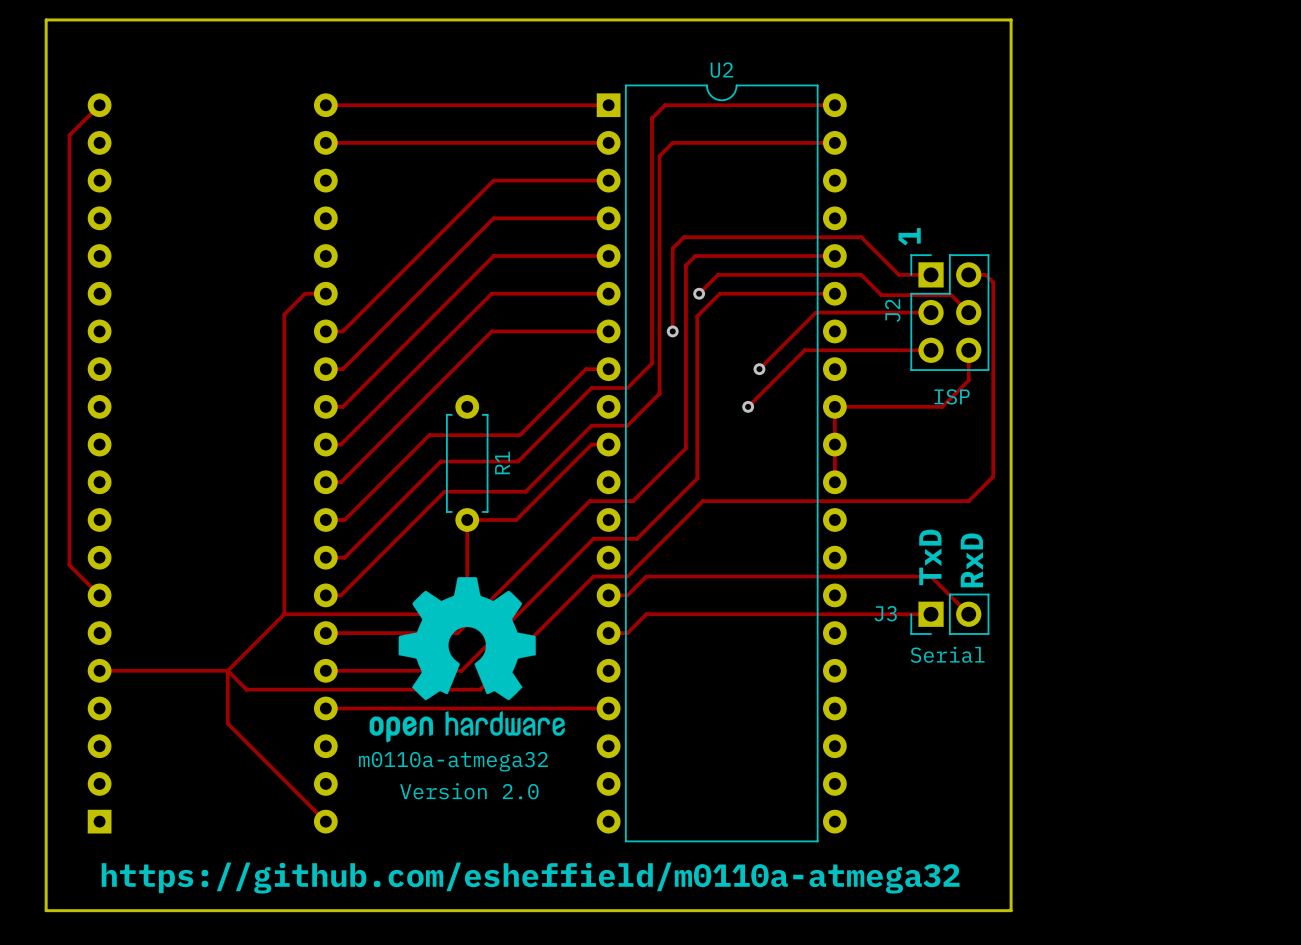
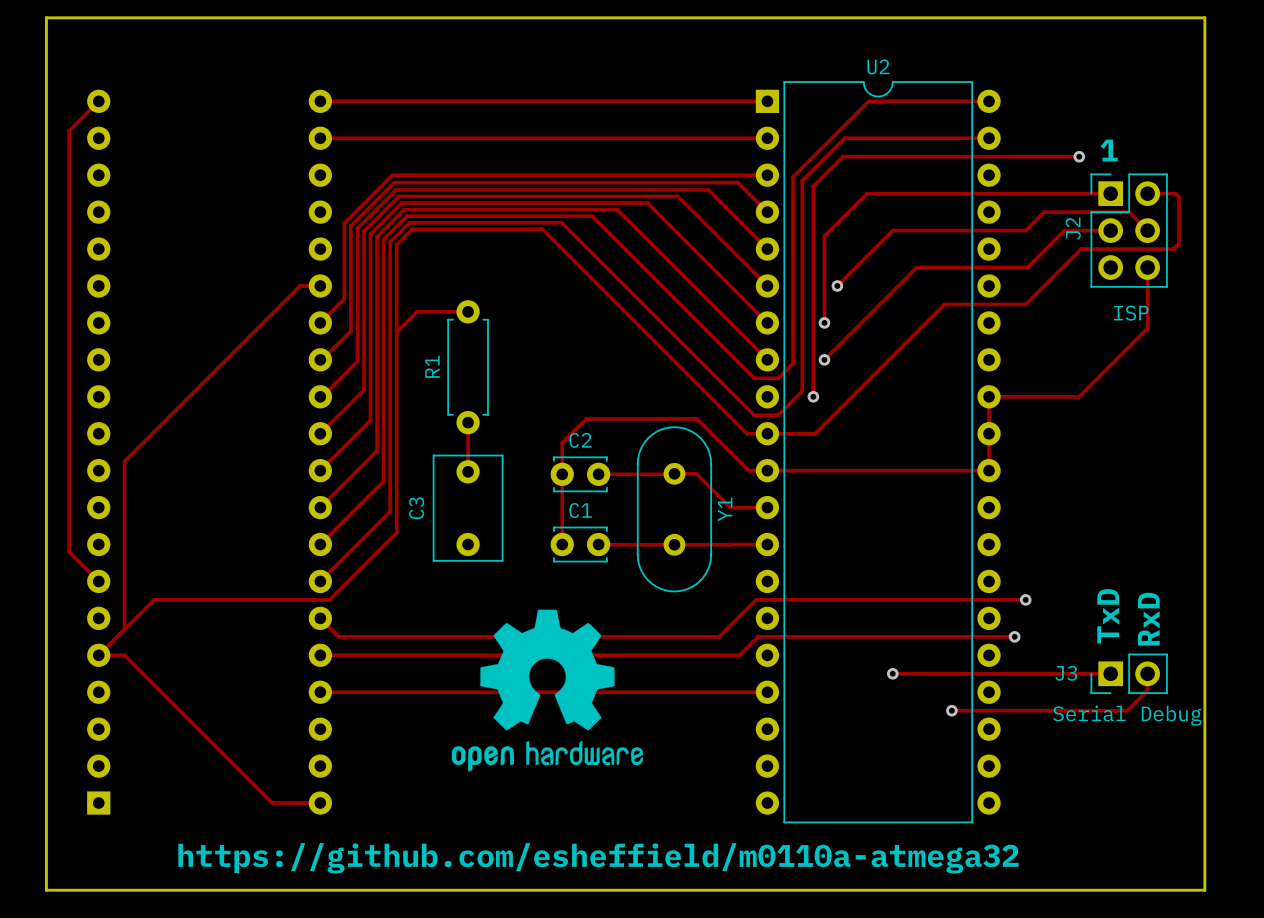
board edge: (1011, 19) (1011, 910) -> (991, 17) (1204, 17) (1204, 890) (991, 890)
track: none -> (597, 101) (652, 101)
track: (665, 105) (652, 118) (652, 363) (627, 388) (591, 388) (518, 461) (440, 461) (344, 557) (325, 557) -> (989, 101) (868, 101) (793, 177) (793, 363) (778, 378) (754, 378) (592, 216) (406, 216) (383, 239) (383, 481) (320, 544)
track: (782, 105) (834, 105) -> none
track: none -> (597, 138) (660, 138)
track: (672, 142) (659, 156) (659, 393) (627, 425) (591, 425) (525, 491) (444, 491) (340, 595) (325, 595) -> (989, 138) (844, 138) (802, 180) (802, 391) (778, 415) (754, 415) (561, 222) (409, 222) (390, 242) (390, 511) (320, 581)
track: (782, 142) (834, 142) -> none
track: none -> (1079, 156) (842, 156) (813, 186) (813, 396)
via: none -> (1079, 156)
track: (493, 180) (342, 331) (325, 331) -> (484, 175) (392, 175) (344, 223) (344, 298) (320, 322)
track: none -> (597, 175) (767, 175)
track: none -> (1110, 193) (866, 193) (824, 236) (824, 322)
track: (608, 218) (493, 218) (342, 369) (327, 369) -> (767, 212) (737, 182) (394, 182) (350, 225) (350, 331) (322, 359)
text rotation: 0° (909, 236) -> 90° clockwise (1109, 150)
text position: 1 (909, 236) -> 1 (1109, 150)
track: none -> (1147, 230) (1129, 212) (1044, 212) (1025, 230) (892, 230) (837, 285)
track: (608, 256) (493, 256) (342, 406) (327, 406) -> (767, 249) (708, 189) (396, 189) (357, 228) (357, 361) (322, 396)
track: (834, 256) (695, 256) (685, 265) (685, 448) (633, 501) (589, 501) (457, 633) (325, 633) -> none
track: (931, 274) (898, 274) (861, 237) (684, 237) (672, 248) (672, 331) -> none
track: none -> (950, 267) (916, 267) (824, 359)
track: (985, 274) (993, 282) (993, 476) (968, 501) (702, 501) (627, 576) (593, 576) (480, 689) (246, 689) (227, 670) -> (966, 267) (1027, 267) (1064, 230) (1110, 230)
track: none -> (1147, 267) (1147, 328) (1079, 396) (989, 396) (989, 470) (748, 470) (697, 418) (586, 418) (562, 442) (562, 544)
track: (608, 293) (491, 293) (340, 444) (325, 444) -> (767, 285) (677, 196) (398, 196) (363, 231) (363, 390) (320, 433)
track: (699, 293) (717, 274) (861, 274) (881, 295) (951, 295) (968, 312) -> none
via: (699, 293) -> none
track: (834, 293) (719, 293) (697, 316) (697, 478) (636, 538) (593, 538) (461, 670) -> (1014, 636) (757, 636) (739, 655) (453, 655)
via: none -> (837, 285)
track: (931, 312) (816, 312) (759, 369) -> none
J2 position: (949, 312) -> (1129, 230)
track: (284, 314) (284, 614) (227, 670) -> (279, 306) (124, 461) (124, 629)
track: none -> (468, 311) (417, 311) (396, 332)
track: (608, 331) (491, 331) (340, 482) (325, 482) -> (767, 322) (647, 203) (401, 203) (370, 234) (370, 420) (320, 470)
via: (672, 331) -> none
via: none -> (824, 322)
track: (931, 350) (804, 350) (748, 406) -> none
track: (968, 350) (968, 380) (942, 406) (834, 406) (834, 482) -> none
track: (608, 369) (586, 369) (520, 435) (429, 435) (344, 519) (325, 519) -> (767, 359) (617, 209) (404, 209) (377, 236) (377, 450) (320, 507)
via: (759, 369) -> none
via: none -> (824, 359)
via: (748, 406) -> none
via: none -> (813, 396)
track: none -> (468, 422) (468, 471)
track: (608, 444) (591, 444) (516, 519) (467, 519) (467, 602) (455, 614) (335, 614) -> (1147, 193) (1175, 193) (1179, 197) (1179, 243) (1173, 249) (1081, 249) (1025, 304) (944, 304) (815, 433) (746, 433) (542, 229) (412, 229) (396, 244) (396, 532) (329, 599)
R1 name position: R1 (502, 462) -> R1 (432, 366)
R1 position: (467, 463) -> (468, 367)
U2 position: (721, 463) -> (878, 452)
C2: none -> (580, 474)
track: none -> (598, 474) (696, 473) (730, 507) (767, 507)
C3: none -> (468, 508)
Y1: none -> (674, 509)
C1: none -> (580, 544)
track: none -> (598, 544) (767, 544)
text position: TxD (930, 557) -> TxD (1108, 616)
text position: RxD (971, 560) -> RxD (1148, 619)
track: (608, 595) (627, 595) (646, 576) (931, 576) (968, 614) -> none
track: none -> (279, 599) (154, 599) (98, 655)
track: (770, 614) (646, 614) (627, 633) (608, 633) -> (756, 599) (719, 636) (338, 636) (320, 618)
track: none -> (913, 599) (1025, 599)
J3 position: (949, 614) -> (1129, 673)
via: none -> (1025, 599)
via: none -> (1014, 636)
J3 value: Serial (947, 654) -> Serial Debug (1127, 715)
drawing position: (467, 659) -> (547, 690)
track: (125, 670) (227, 670) -> none
track: (227, 670) (227, 723) (325, 821) -> (124, 655) (272, 803) (320, 803)
track: none -> (892, 673) (1110, 673)
via: none -> (892, 673)
track: none -> (1147, 673) (1147, 690) (1127, 710) (951, 710)
track: none -> (597, 692) (767, 692)
via: none -> (951, 710)
text: m0110a-atmega32 (453, 761) -> none
text: Version 2.0 (469, 791) -> none
text position: https://github.com/esheffield/m0110a-atmega32 (530, 878) -> https://github.com/esheffield/m0110a-atmega32 (598, 858)

